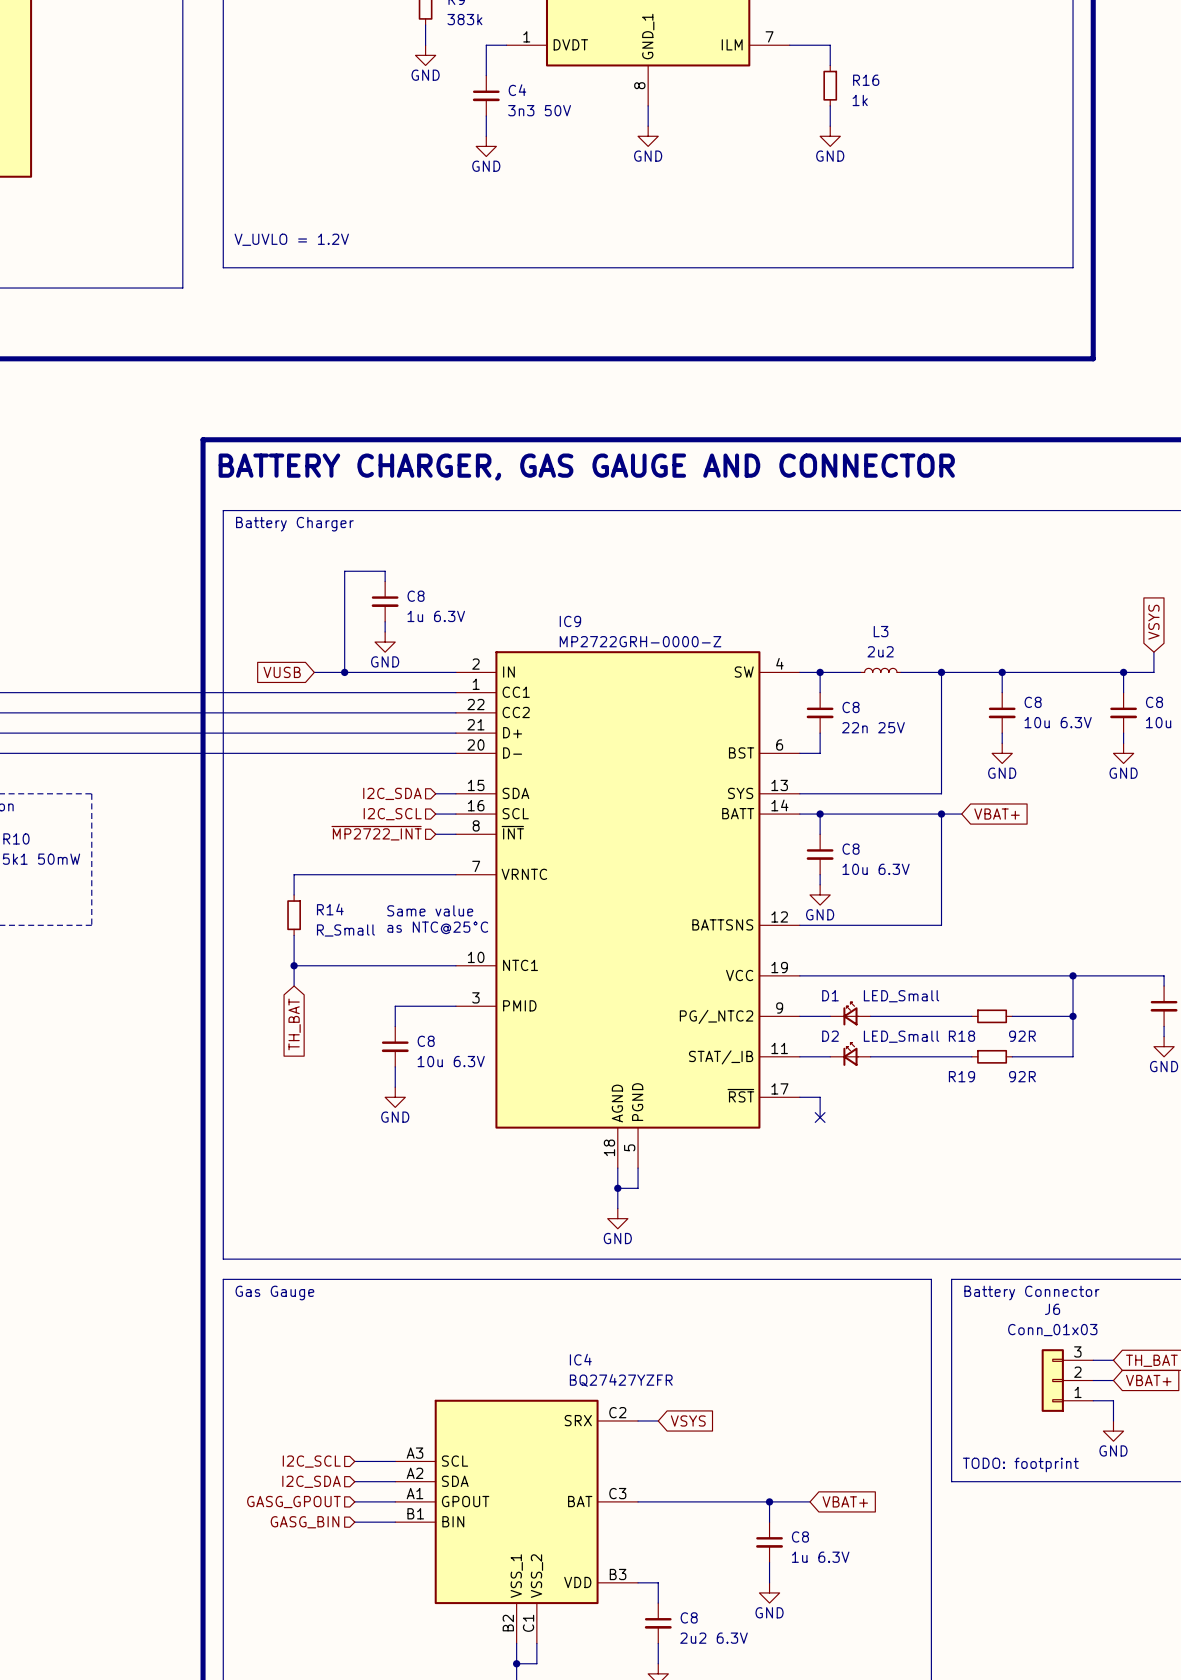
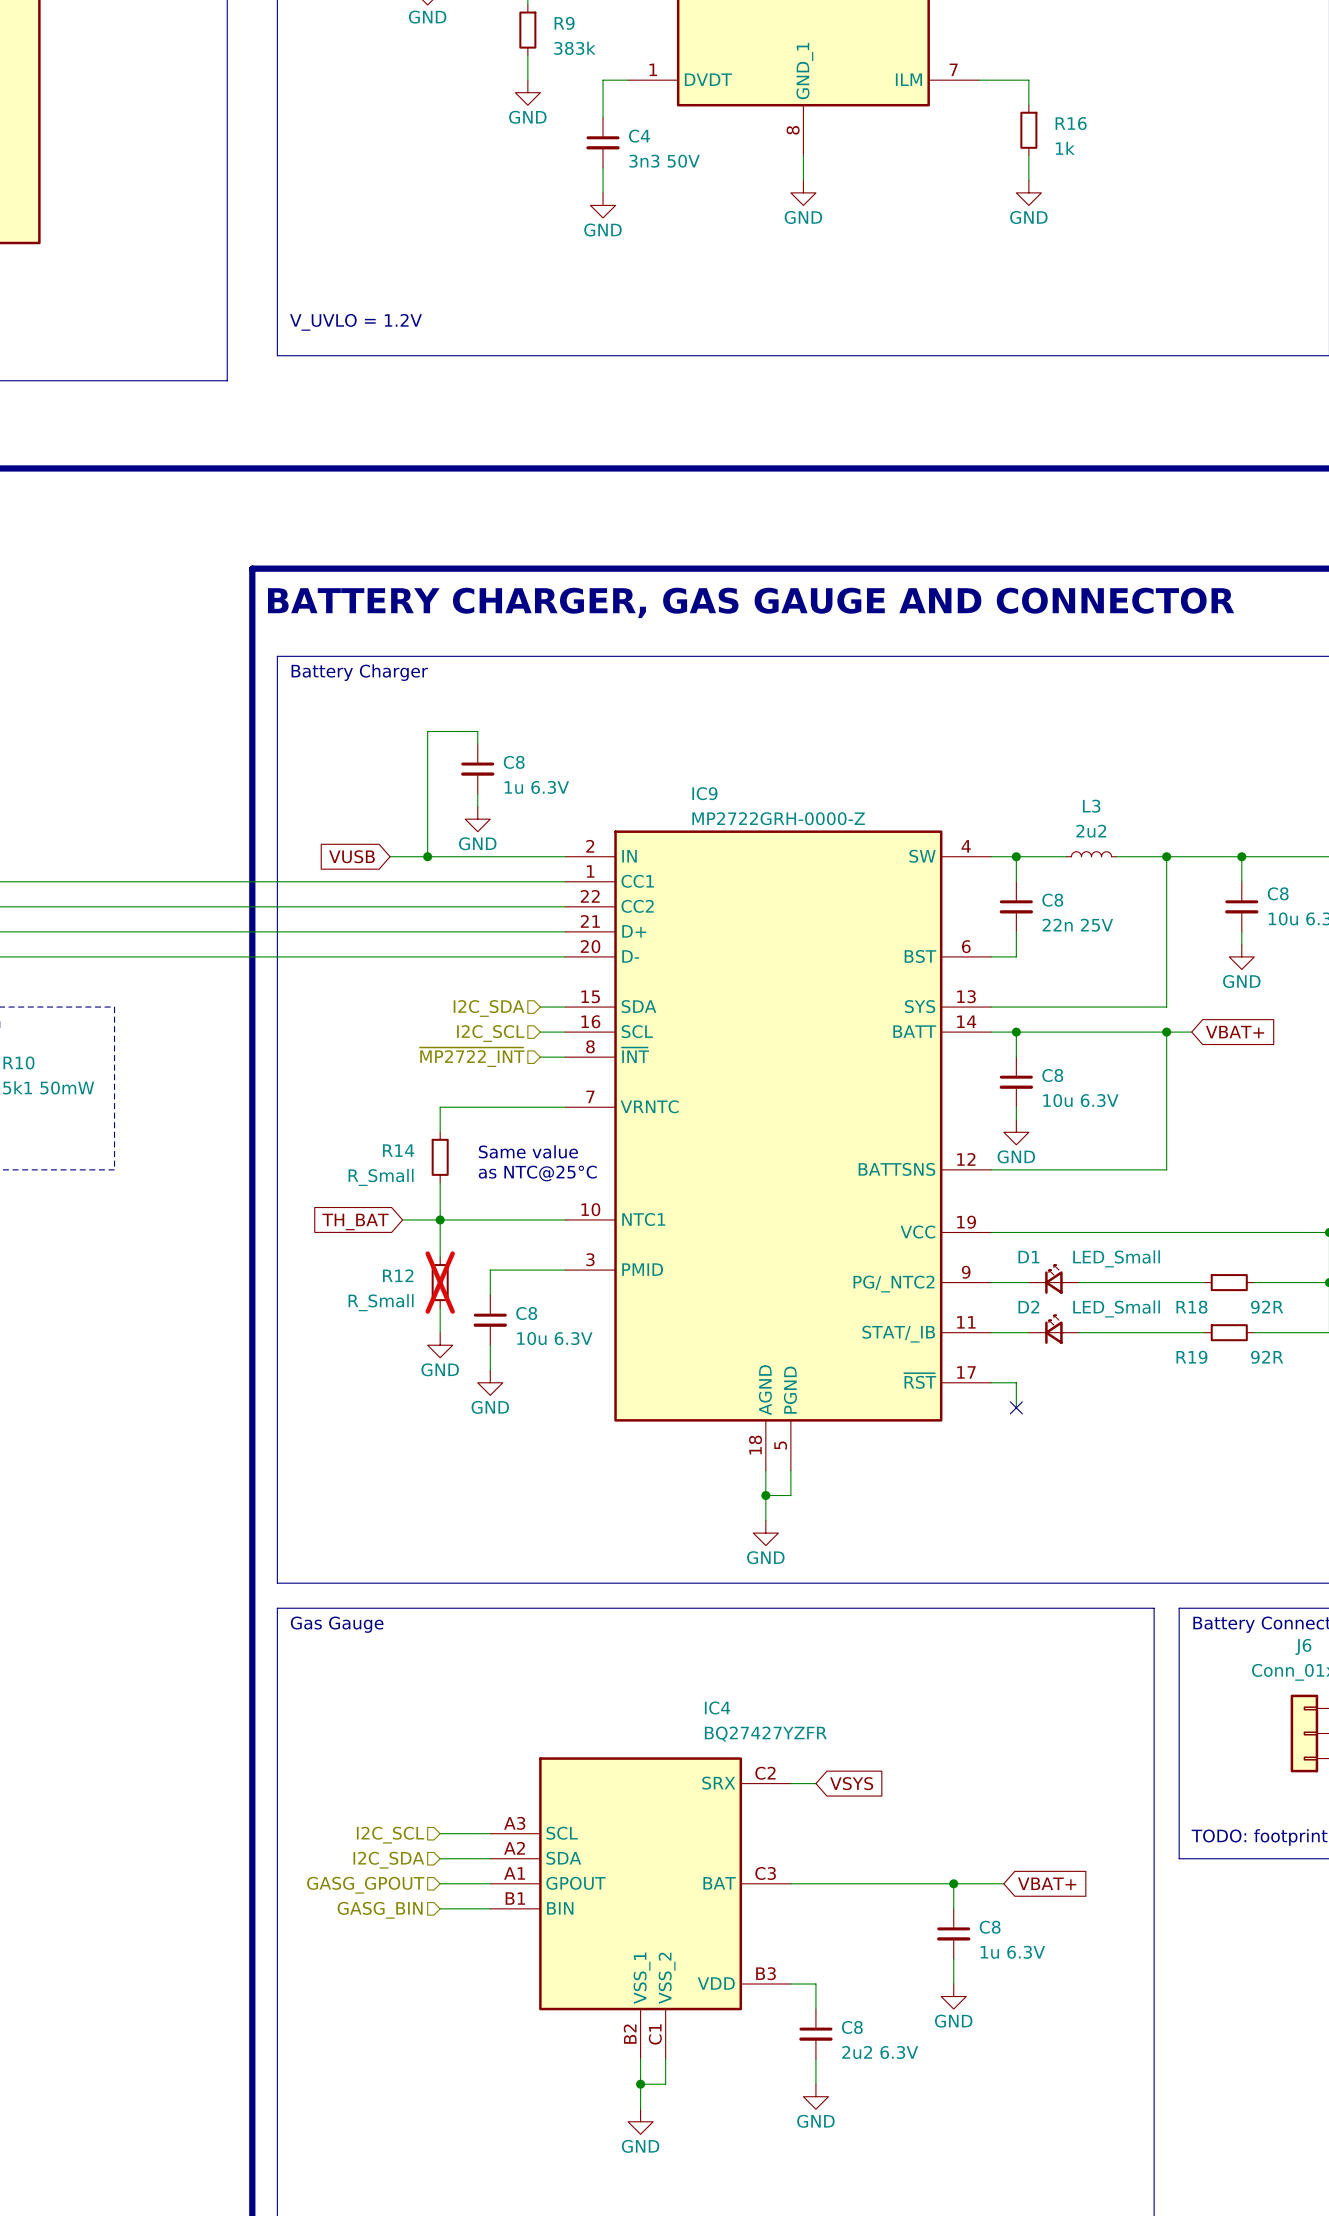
wire: (354, 874) (294, 874) (294, 894) -> (440, 1107) (440, 1132)
R14 name position: R14 (330, 909) -> R14 (398, 1150)
R14 position: (294, 915) -> (440, 1157)
R14 value position: R_Small (345, 930) -> R_Small (381, 1177)
wire: (294, 935) (294, 986) -> none
wire: none -> (440, 1182) (440, 1257)
wire: (294, 965) (324, 965) -> none
junction: (294, 965) -> none
junction: none -> (440, 1219)
R12: none -> R_Small (440, 1282)
global label rotation: 0° (294, 1024) -> 90° clockwise (355, 1221)
wire: none -> (440, 1307) (440, 1332)
power symbol: none -> GND (440, 1345)

